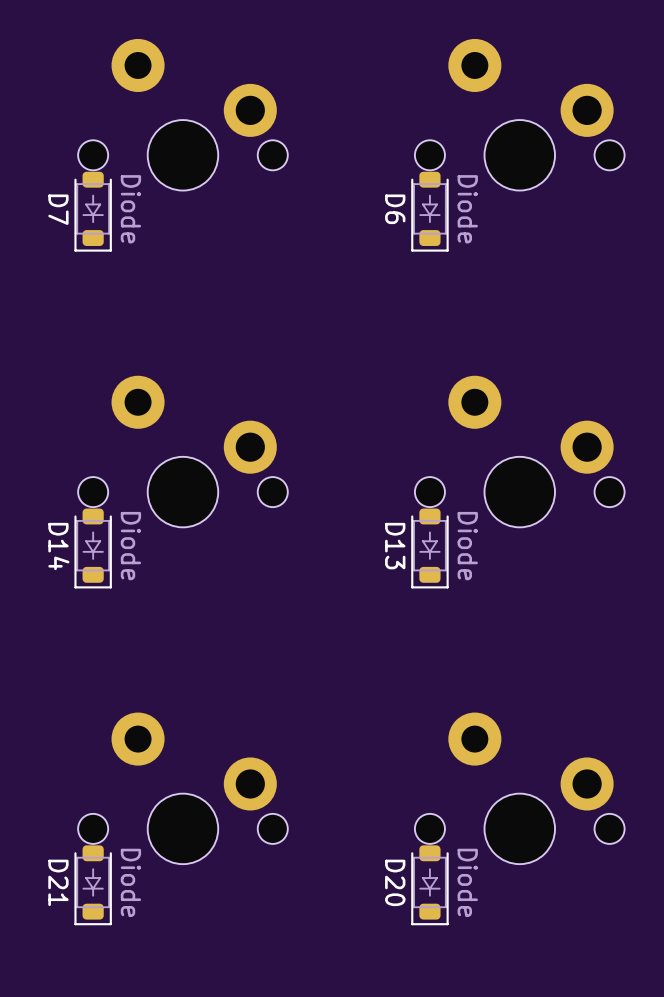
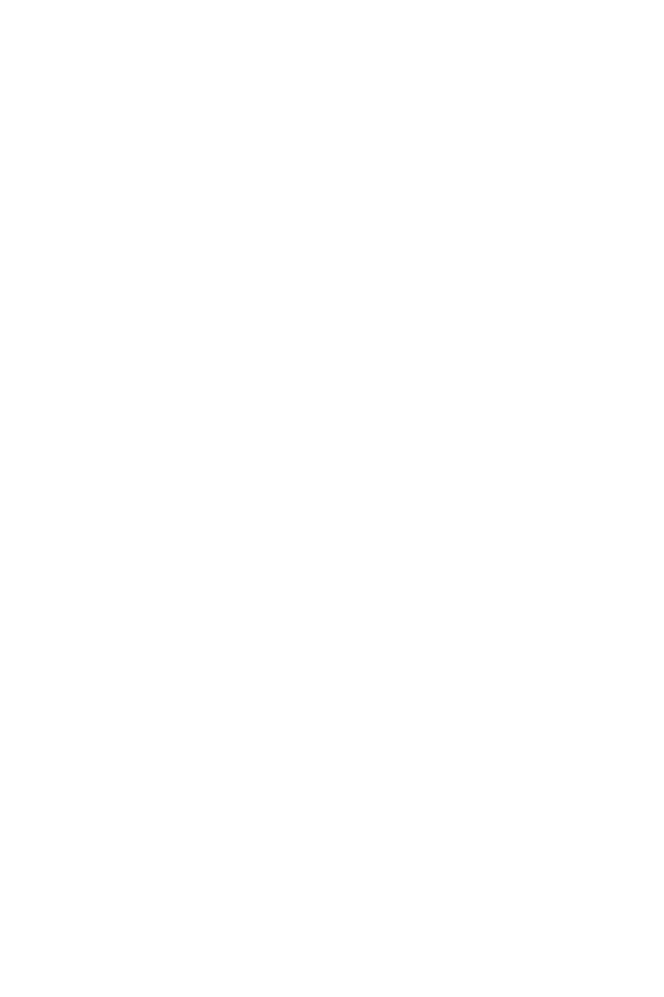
part: (182, 114) -> none
part: (519, 114) -> none
D7: Diode (93, 211) -> none
D6: Diode (429, 211) -> none
part: (182, 451) -> none
part: (519, 451) -> none
D14: Diode (93, 548) -> none
D13: Diode (429, 548) -> none
part: (182, 788) -> none
part: (519, 788) -> none
D21: Diode (93, 885) -> none
D20: Diode (429, 885) -> none

